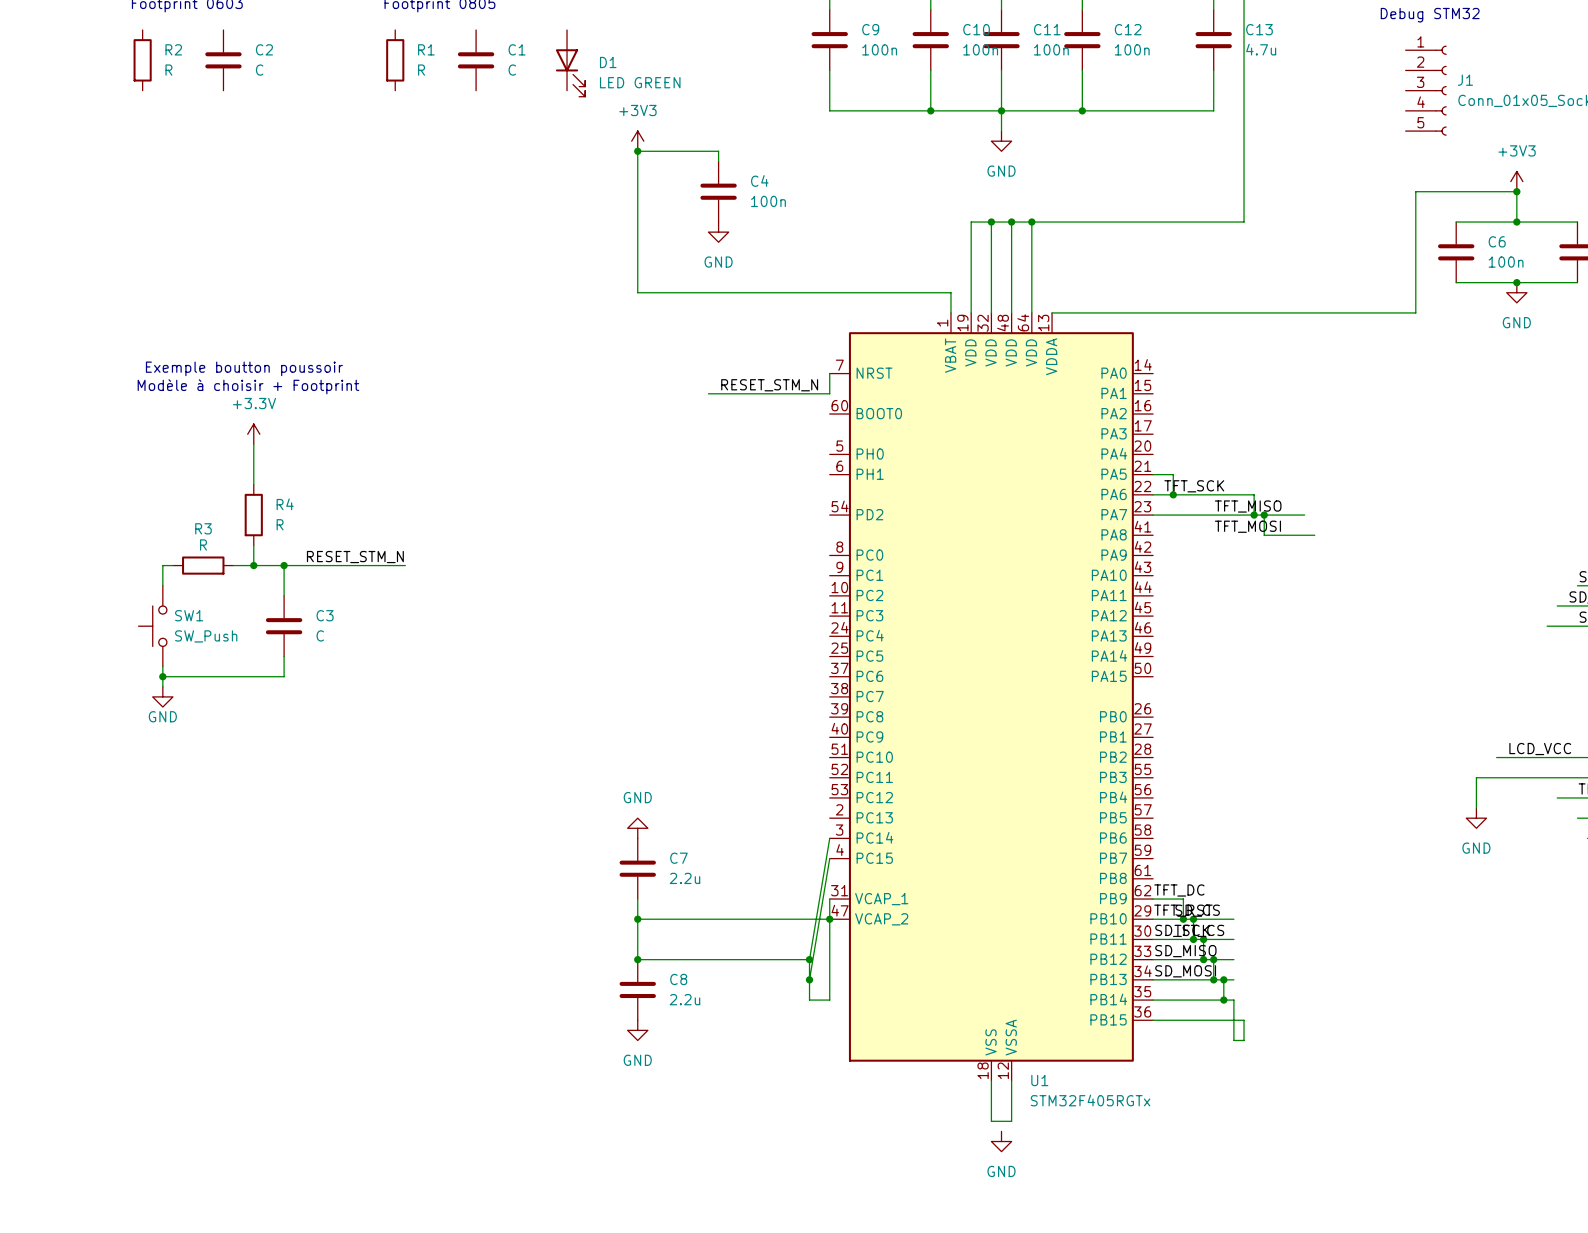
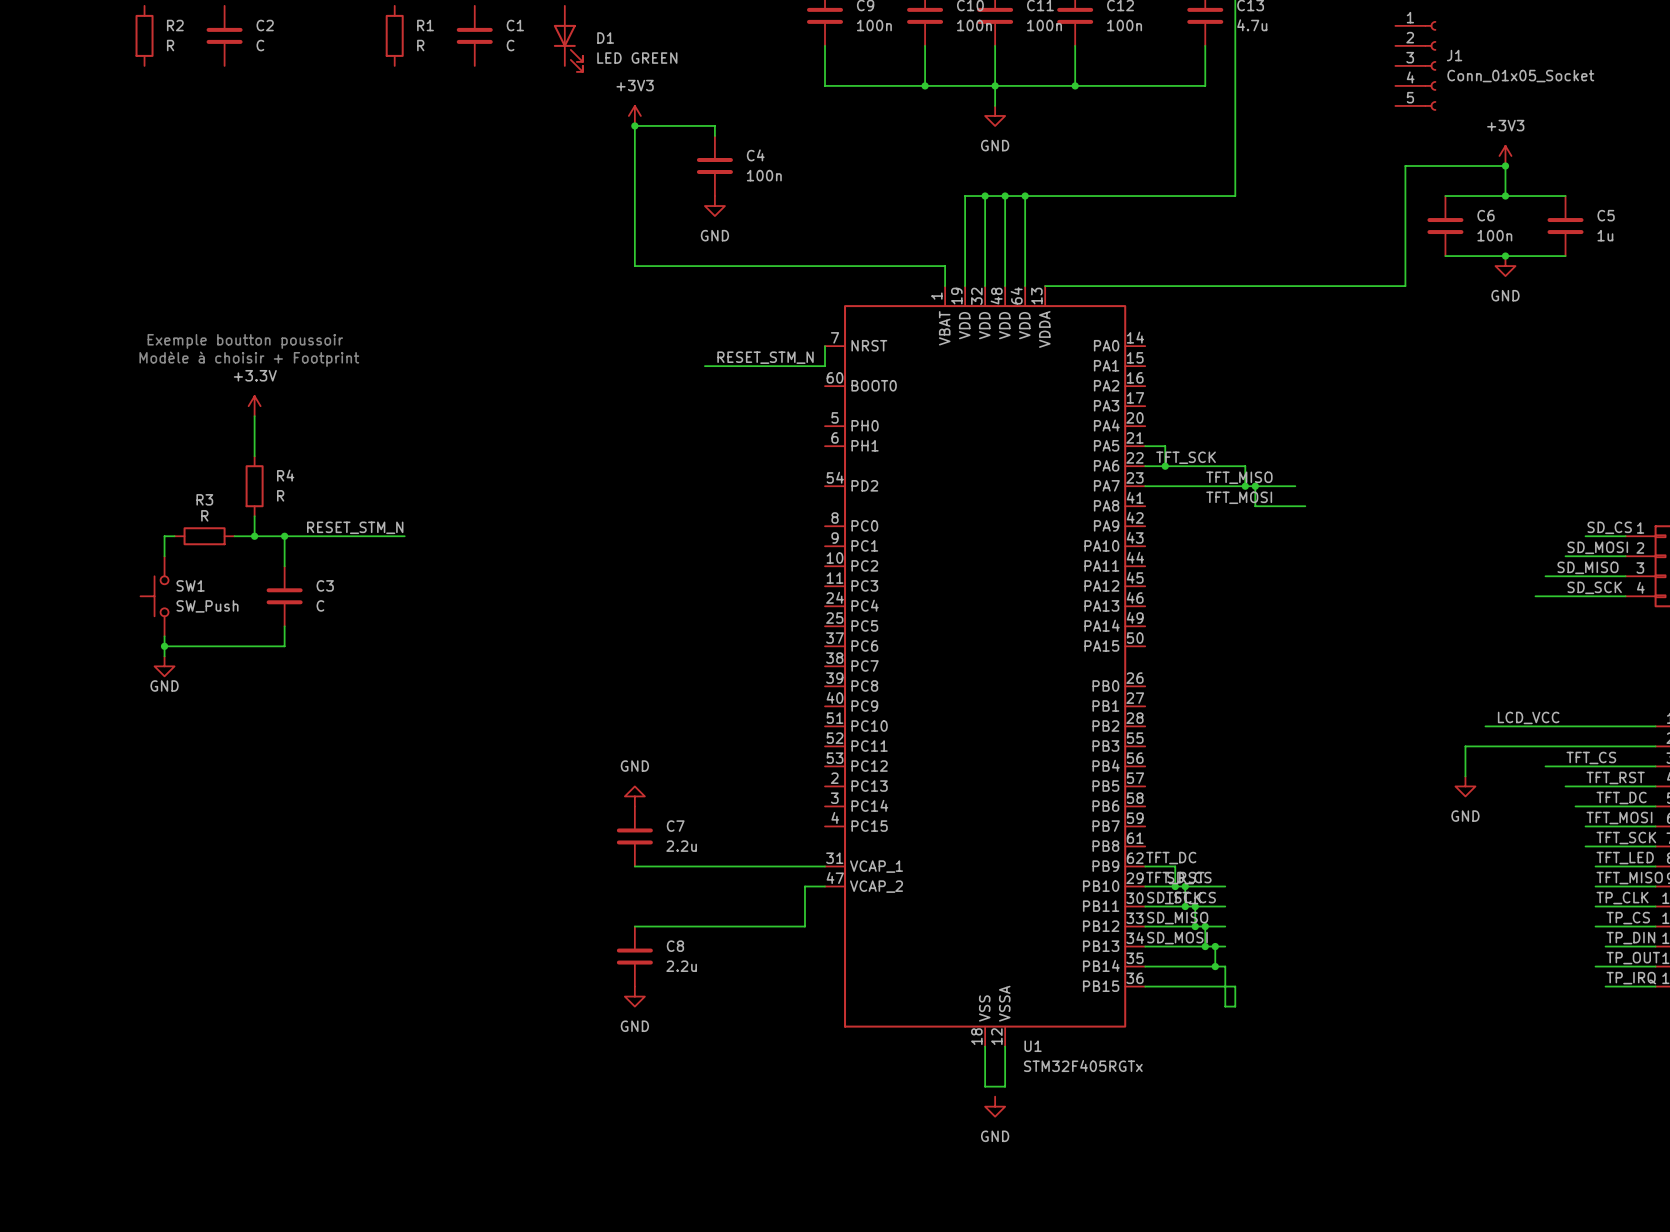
wire: (829, 838) (809, 959) (809, 1000) (829, 1000) (829, 899) -> none
wire: (829, 858) (809, 979) -> none
wire: (637, 899) (637, 959) -> (634, 866) (825, 866)
wire: (637, 919) (809, 919) -> (804, 926) (804, 886)
junction: (637, 919) -> none
junction: (829, 919) -> none
junction: (637, 959) -> none
junction: (809, 959) -> none
junction: (809, 979) -> none

